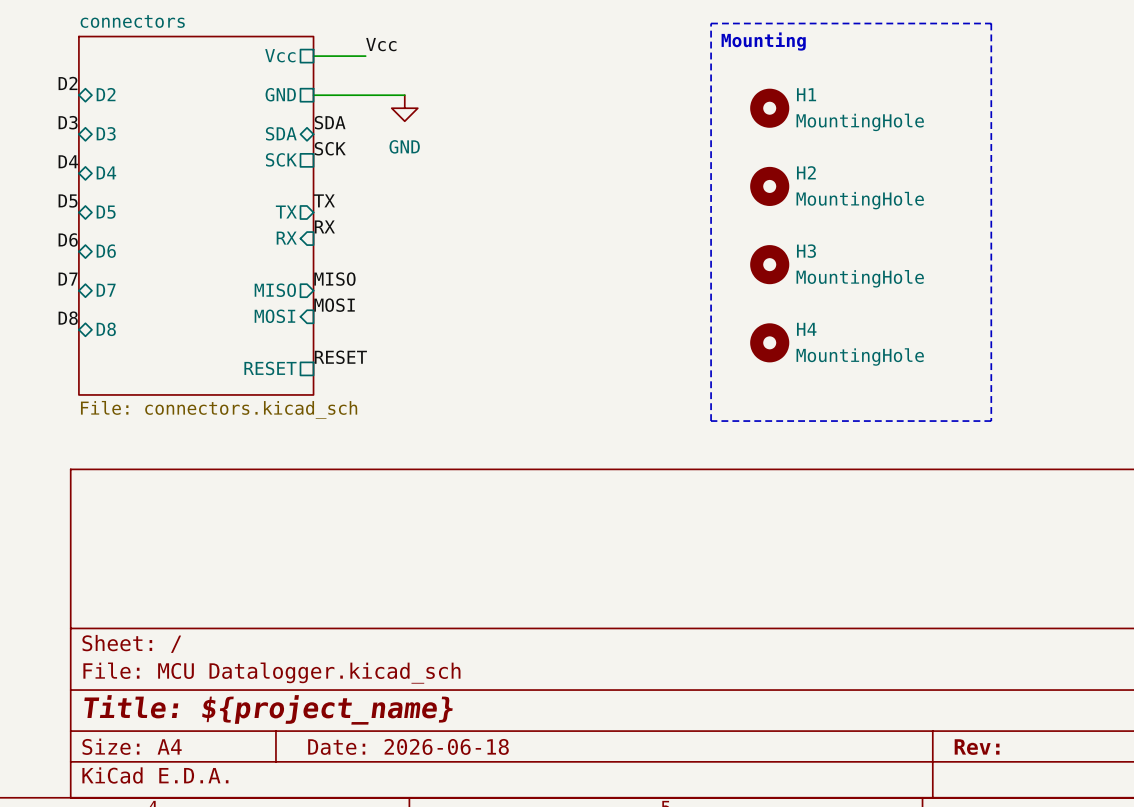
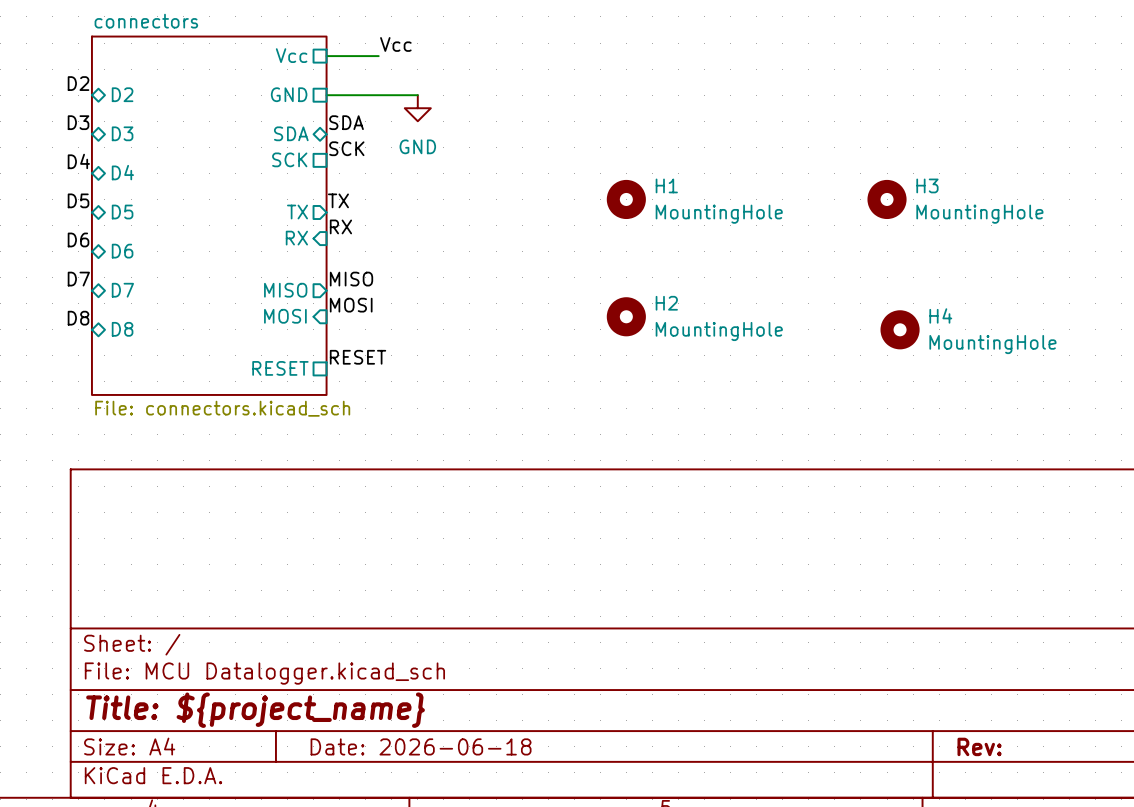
line: (711, 23) (991, 23) (991, 421) (711, 421) (711, 23) -> none
text: Mounting (763, 41) -> none
label position: Vcc (381, 44) -> Vcc (395, 44)
sheet pin position: Vcc (280, 55) -> Vcc (291, 55)
wire: (313, 56) (326, 56) -> (365, 56) (378, 56)
label position: D2 (68, 83) -> D2 (78, 83)
sheet pin position: D2 (106, 94) -> D2 (122, 94)
sheet pin position: GND (280, 94) -> GND (289, 94)
wire: (313, 95) (326, 95) -> (404, 95) (417, 95)
power symbol position: GND (404, 108) -> GND (417, 108)
H1 position: (769, 108) -> (626, 199)
label position: D3 (68, 122) -> D3 (78, 122)
label position: SDA (330, 122) -> SDA (346, 122)
sheet pin position: D3 (106, 133) -> D3 (122, 133)
sheet pin position: SDA (281, 133) -> SDA (291, 133)
label position: SCK (330, 148) -> SCK (346, 148)
sheet pin position: SCK (281, 159) -> SCK (289, 159)
label position: D4 (68, 161) -> D4 (78, 161)
sheet pin position: D4 (106, 172) -> D4 (122, 172)
H2 position: (769, 186) -> (626, 316)
label position: TX (324, 200) -> TX (338, 200)
label position: D5 (68, 201) -> D5 (78, 200)
sheet pin position: D5 (106, 212) -> D5 (122, 212)
sheet pin position: TX (286, 212) -> TX (297, 212)
sheet connectors position: (196, 215) -> (209, 215)
label position: RX (324, 226) -> RX (340, 226)
sheet pin position: RX (286, 238) -> RX (296, 238)
label position: D6 (68, 239) -> D6 (78, 239)
sheet pin position: D6 (106, 251) -> D6 (122, 251)
H3 position: (769, 264) -> (887, 199)
label position: D7 (68, 279) -> D7 (78, 279)
label position: MISO (334, 279) -> MISO (351, 279)
sheet pin position: D7 (106, 290) -> D7 (122, 290)
sheet pin position: MISO (275, 290) -> MISO (285, 290)
label position: MOSI (334, 305) -> MOSI (351, 305)
sheet pin position: MOSI (274, 316) -> MOSI (285, 316)
label position: D8 (68, 318) -> D8 (78, 318)
sheet pin position: D8 (106, 329) -> D8 (122, 329)
H4 position: (769, 342) -> (900, 329)
label position: RESET (340, 357) -> RESET (358, 357)
sheet pin position: RESET (270, 368) -> RESET (280, 368)

